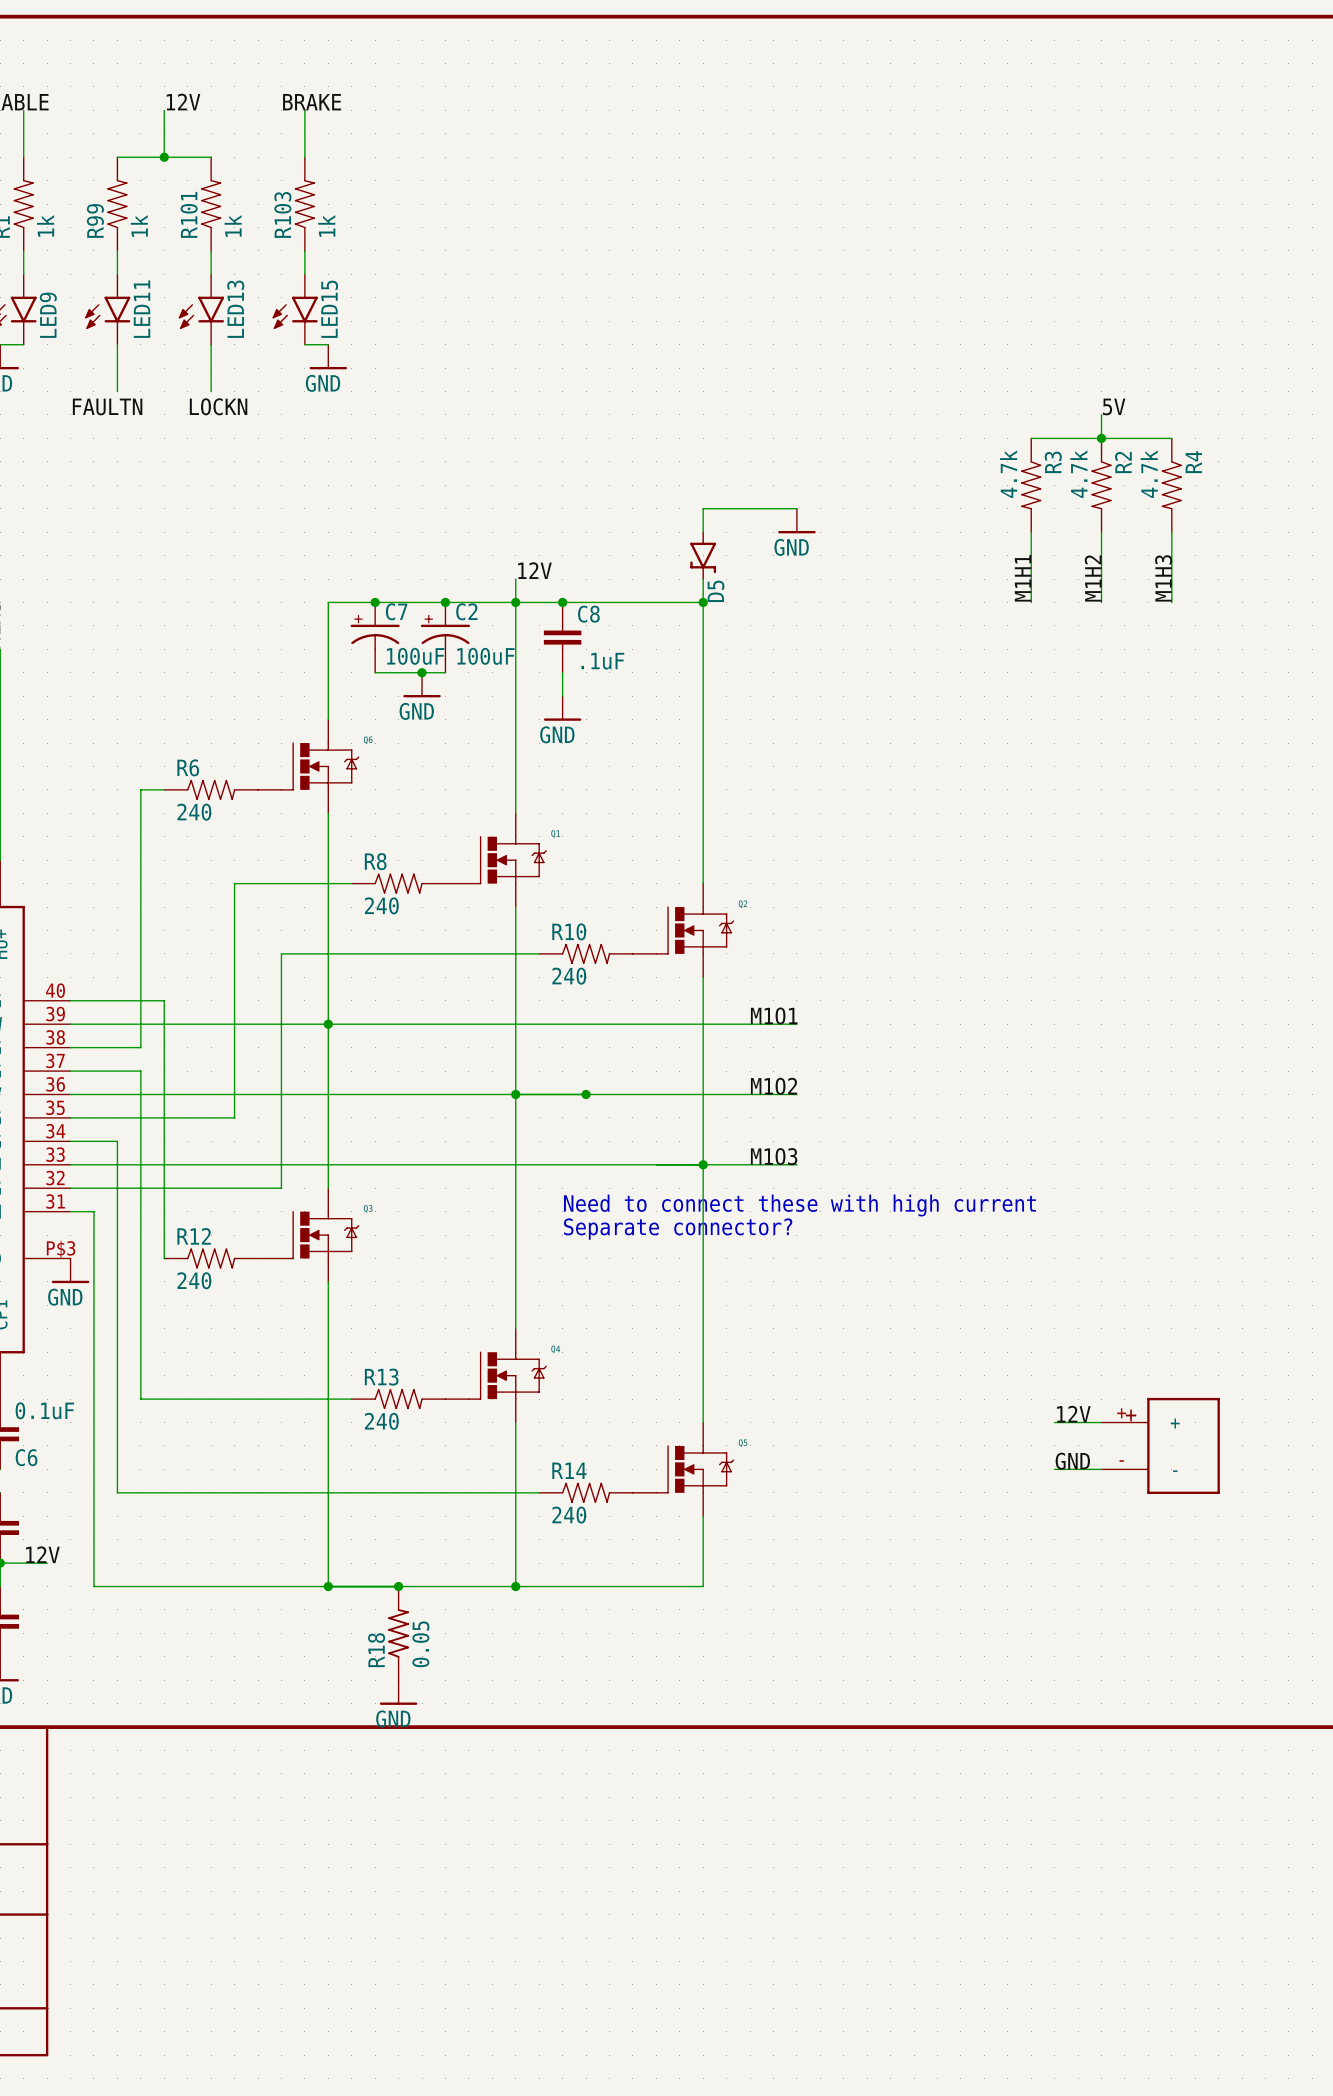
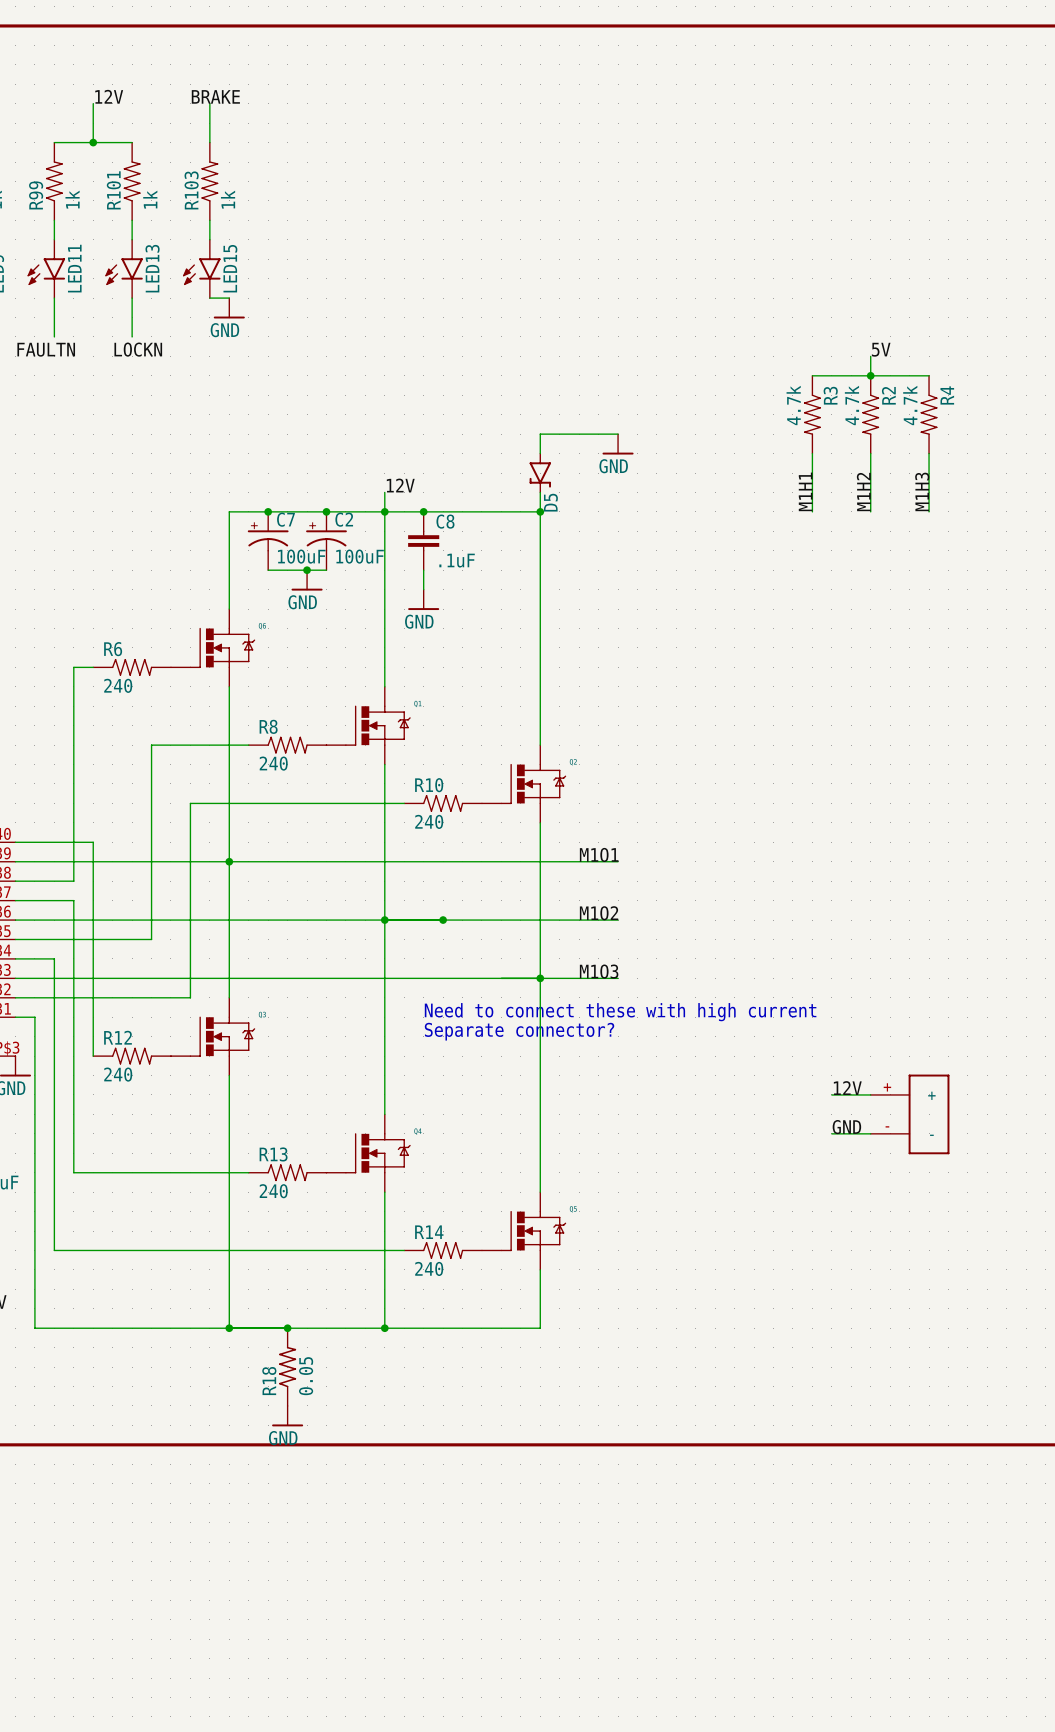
part: none -> (910, 1114)
label position: 12V (1073, 1414) -> 12V (847, 1088)
wire: (1054, 1422) (1101, 1422) -> (831, 1133) (870, 1133)
part: (1160, 1445) -> none
label position: GND (1072, 1461) -> GND (846, 1127)
wire: (1054, 1469) (1101, 1469) -> (831, 1094) (870, 1094)

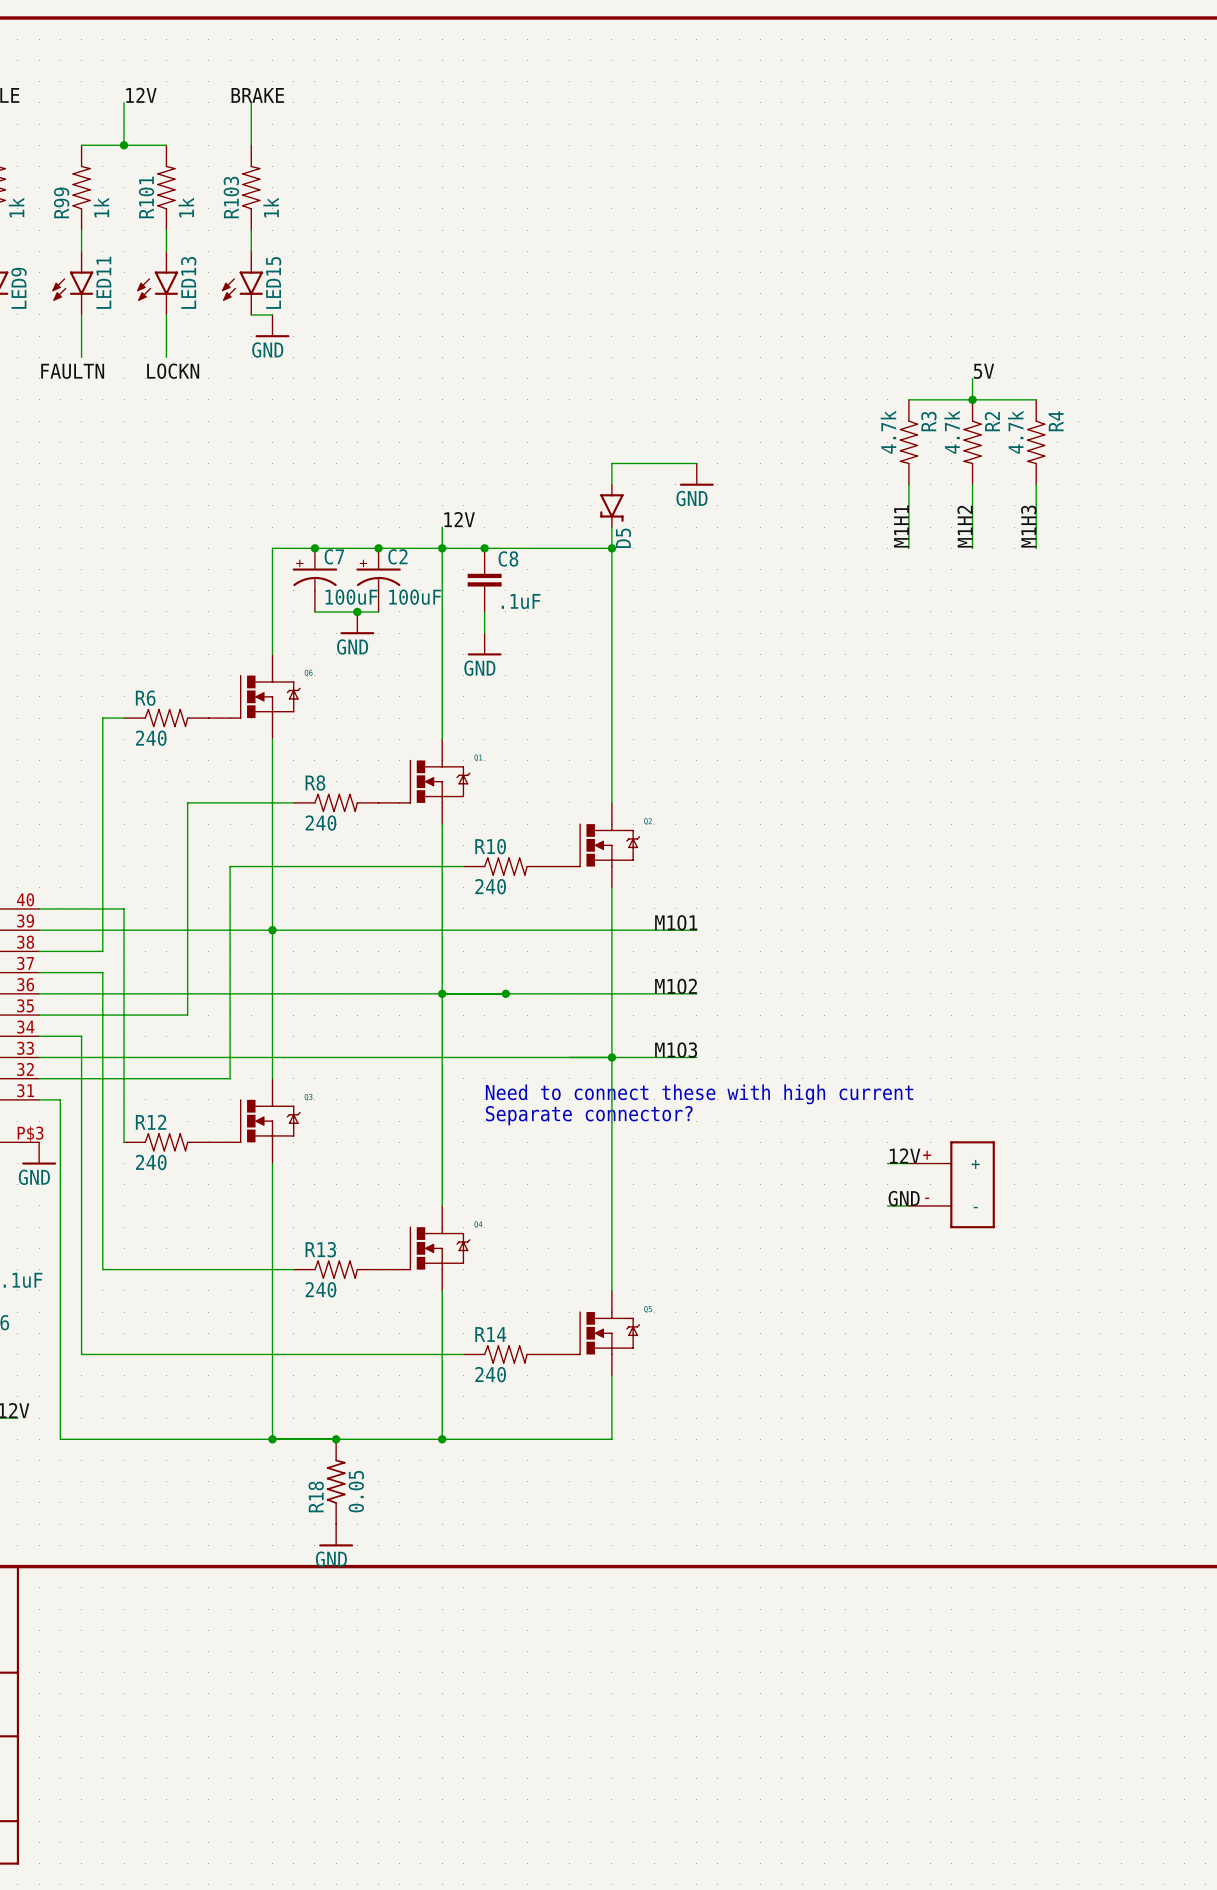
wire: none -> (887, 1163) (908, 1163)
label position: 12V (847, 1088) -> 12V (905, 1155)
wire: (831, 1094) (870, 1094) -> none
wire: none -> (887, 1205) (908, 1205)
part position: (910, 1114) -> (951, 1184)
label position: GND (846, 1127) -> GND (904, 1198)

